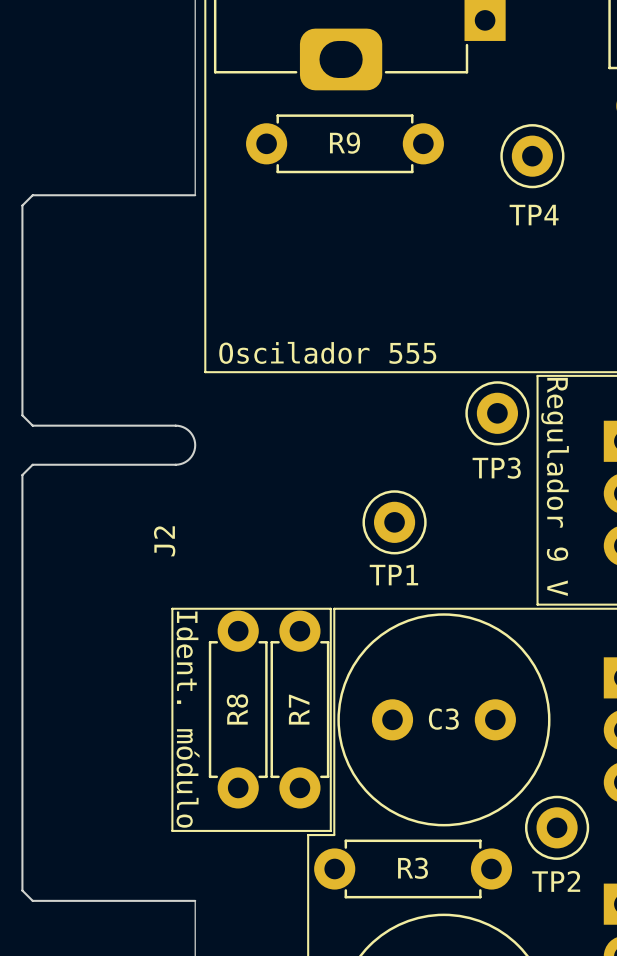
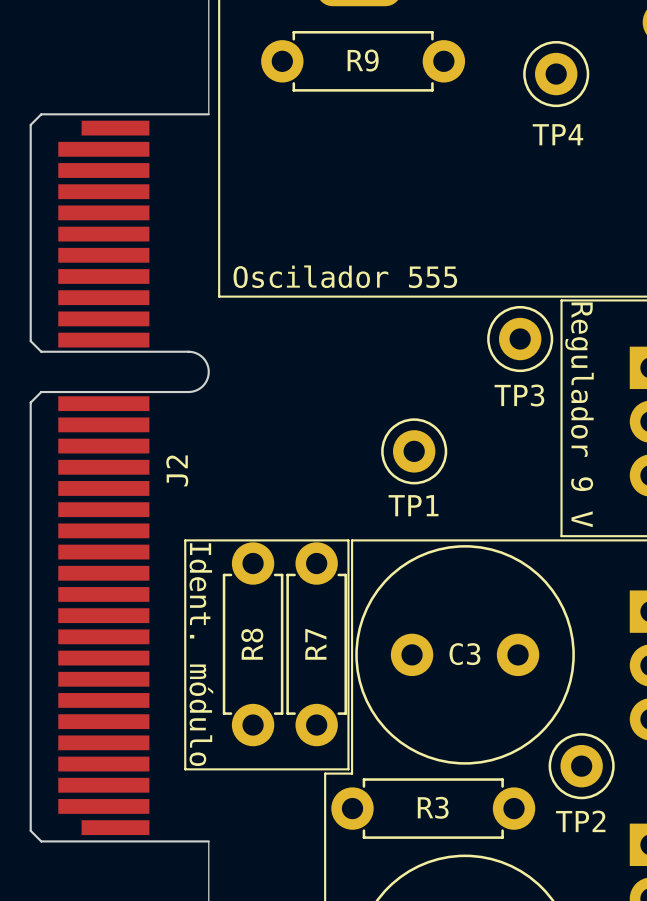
J2 footprint: [21, 194, 197, 902] -> [29, 113, 210, 843]

